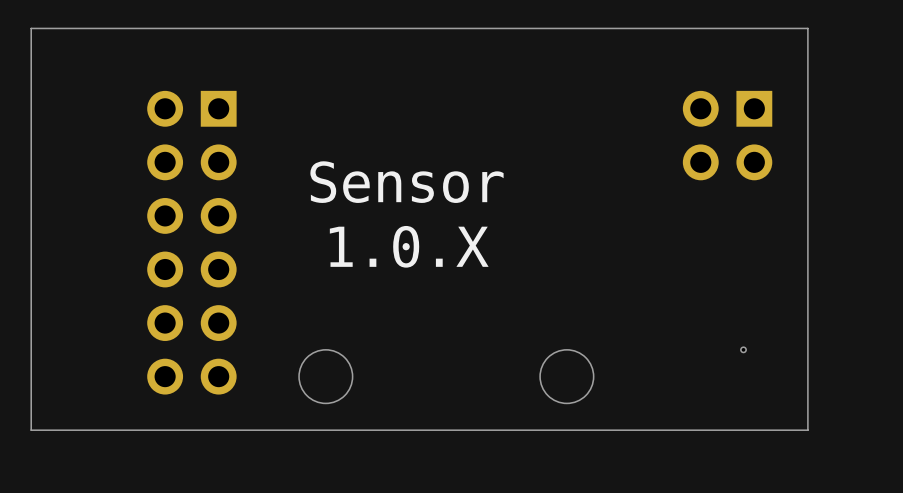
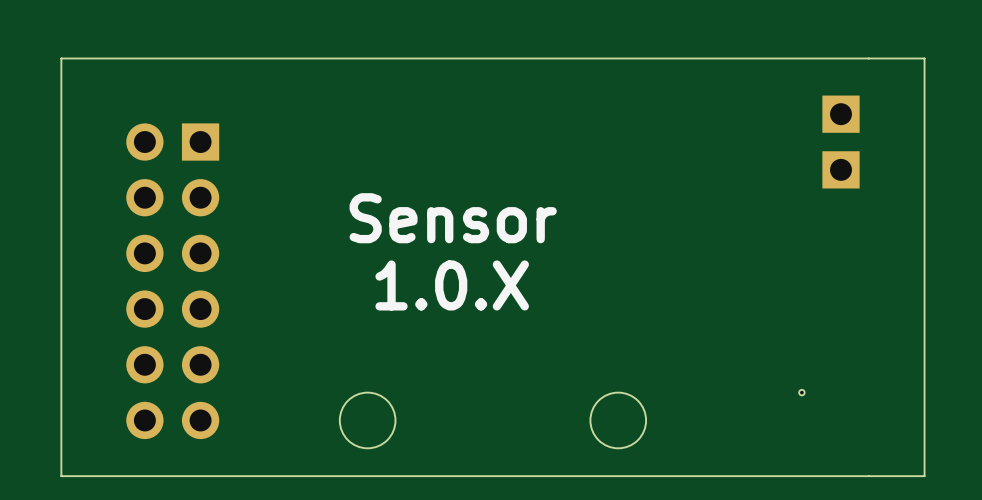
board edge: (807, 28) (807, 430) -> (868, 58) (924, 58) (924, 476) (868, 476)
part: none -> (841, 114)
part: (727, 135) -> none
part: none -> (841, 169)
part position: (191, 242) -> (172, 281)

